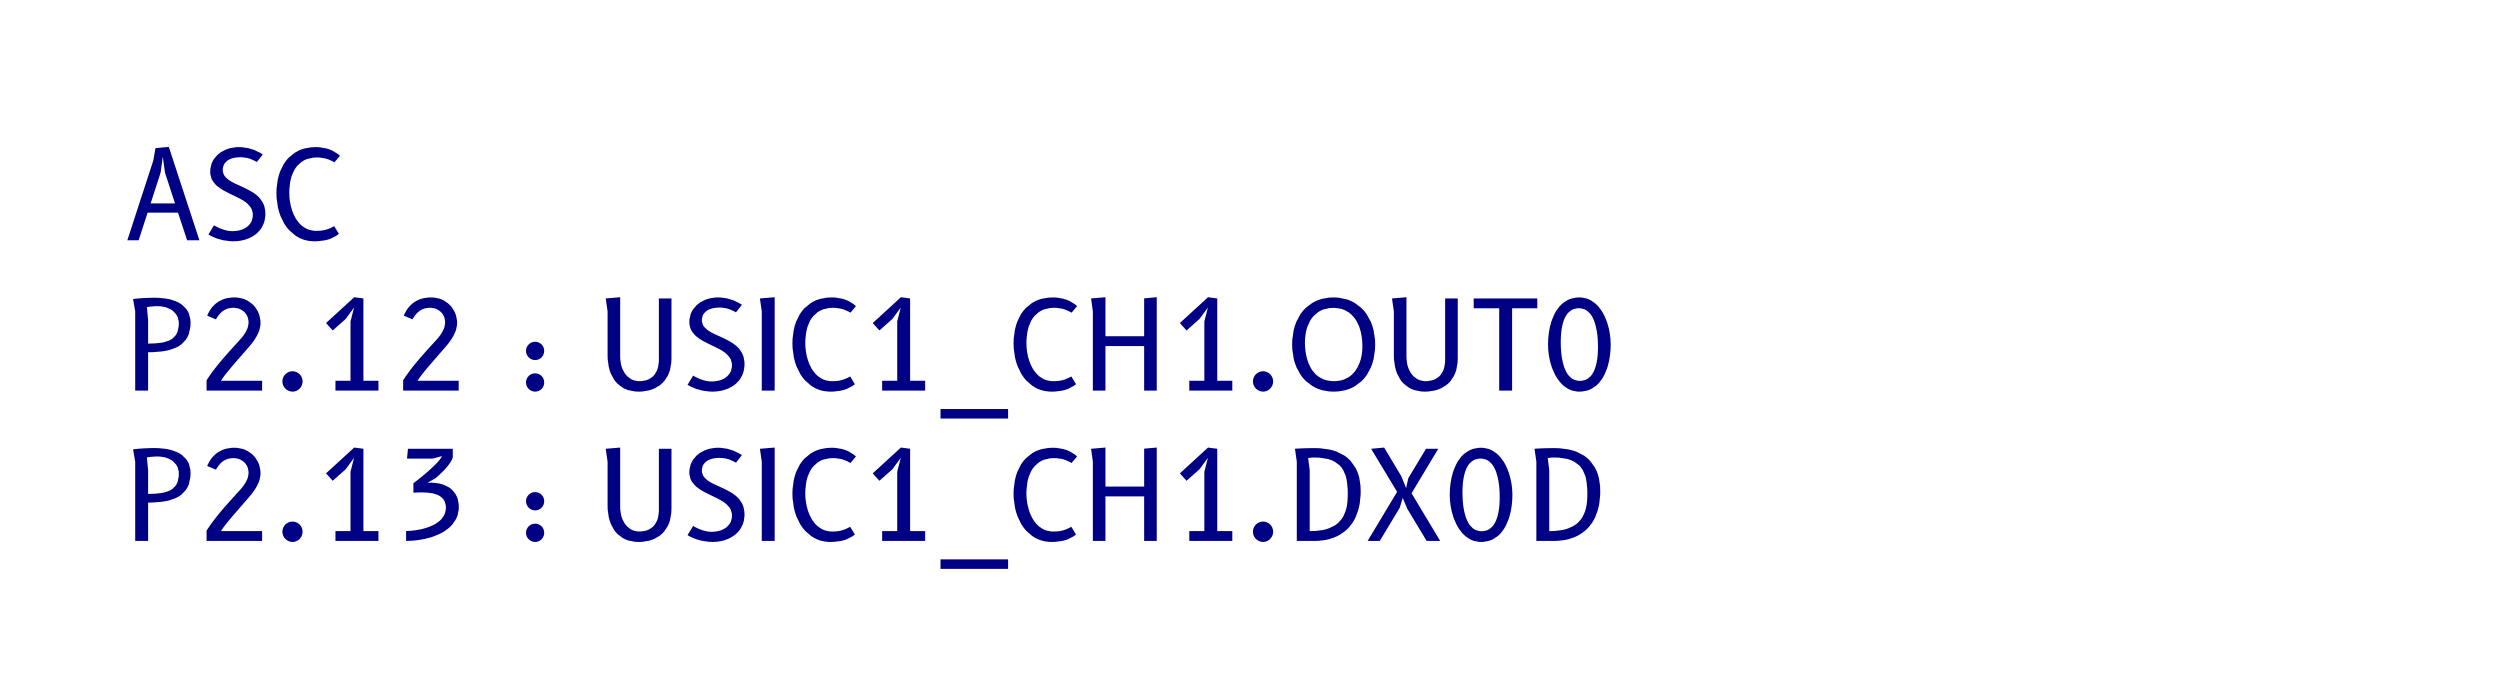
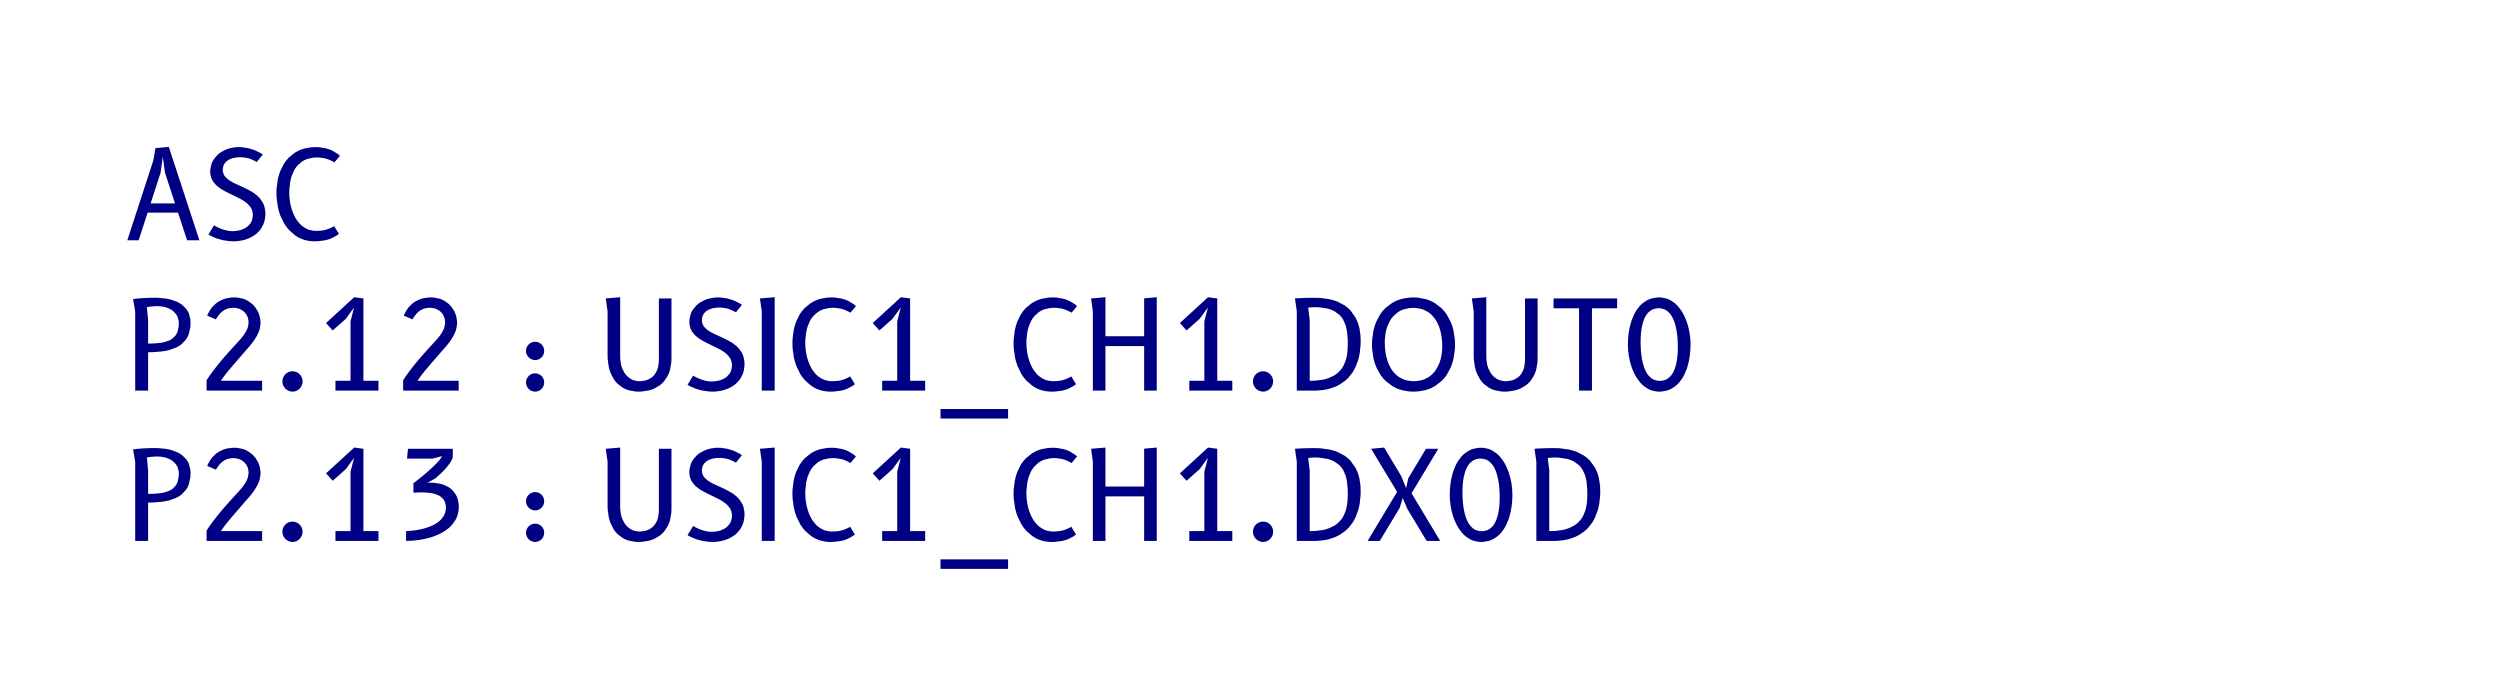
text: P2.12 : USIC1_CH1.OUT0 (871, 357) -> P2.12 : USIC1_CH1.DOUT0 (911, 357)

